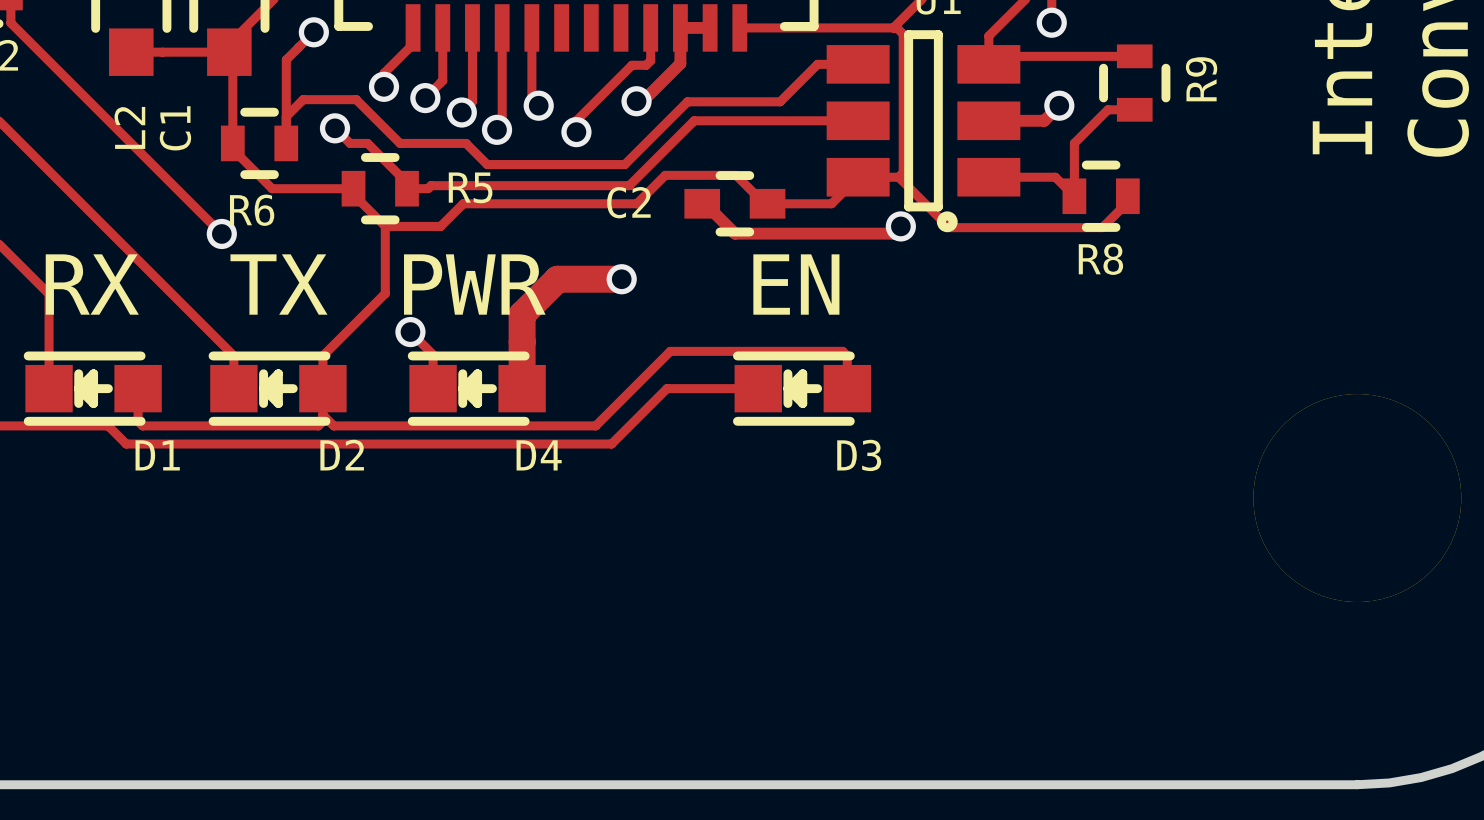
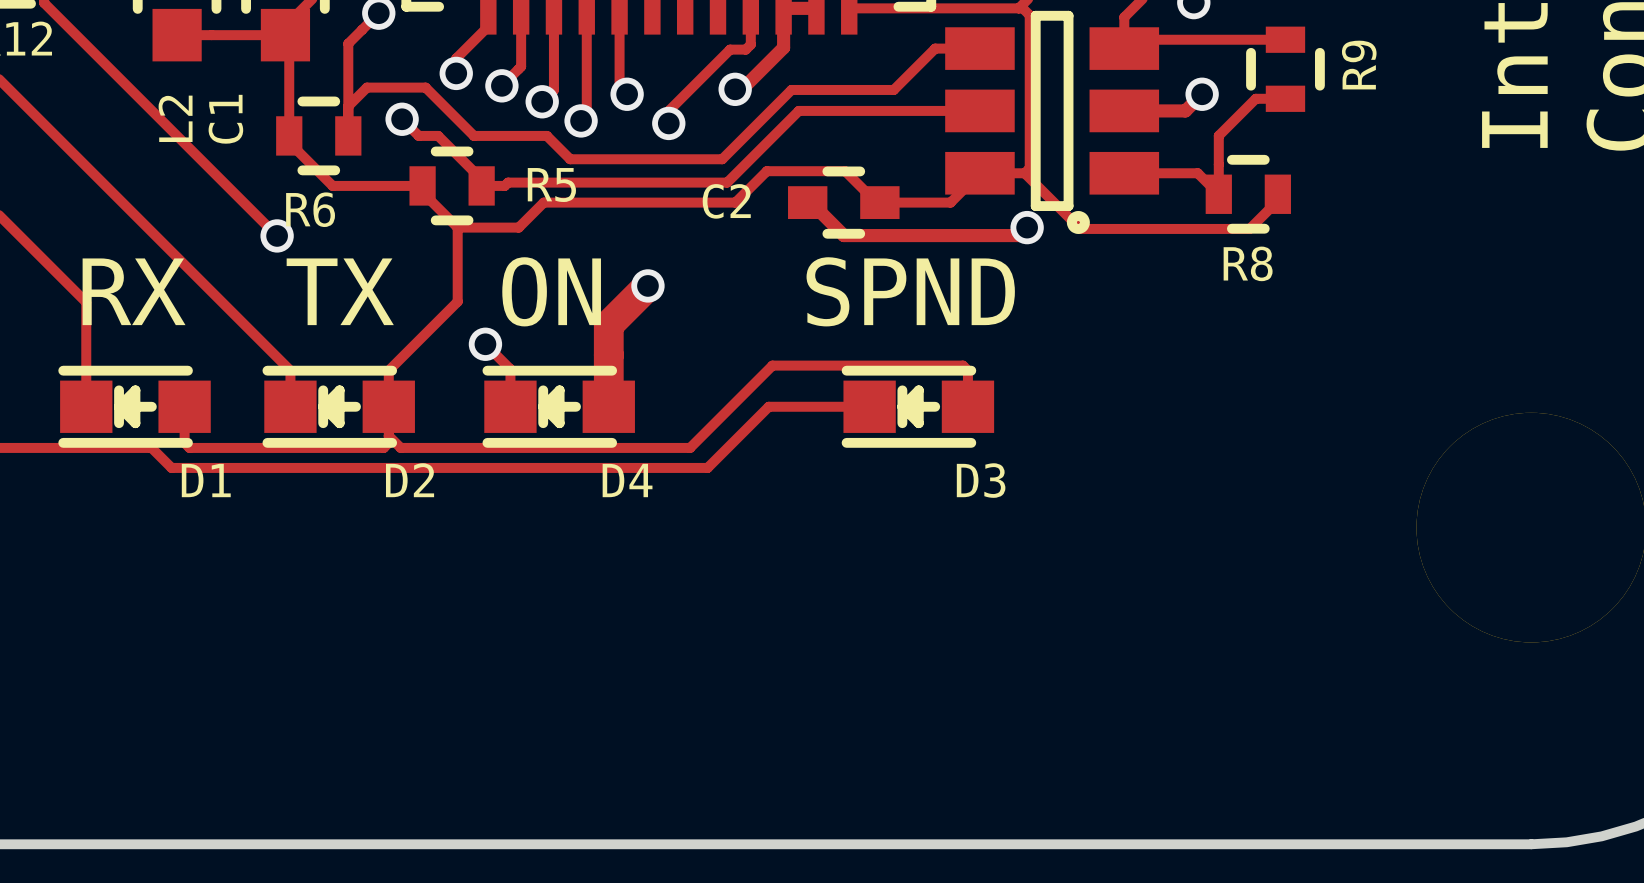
track: (557, 279) (621, 279) -> none
via position: (621, 279) -> (647, 285)
text: PWR (474, 284) -> ON (551, 291)
text: EN (796, 284) -> SPND (910, 291)

